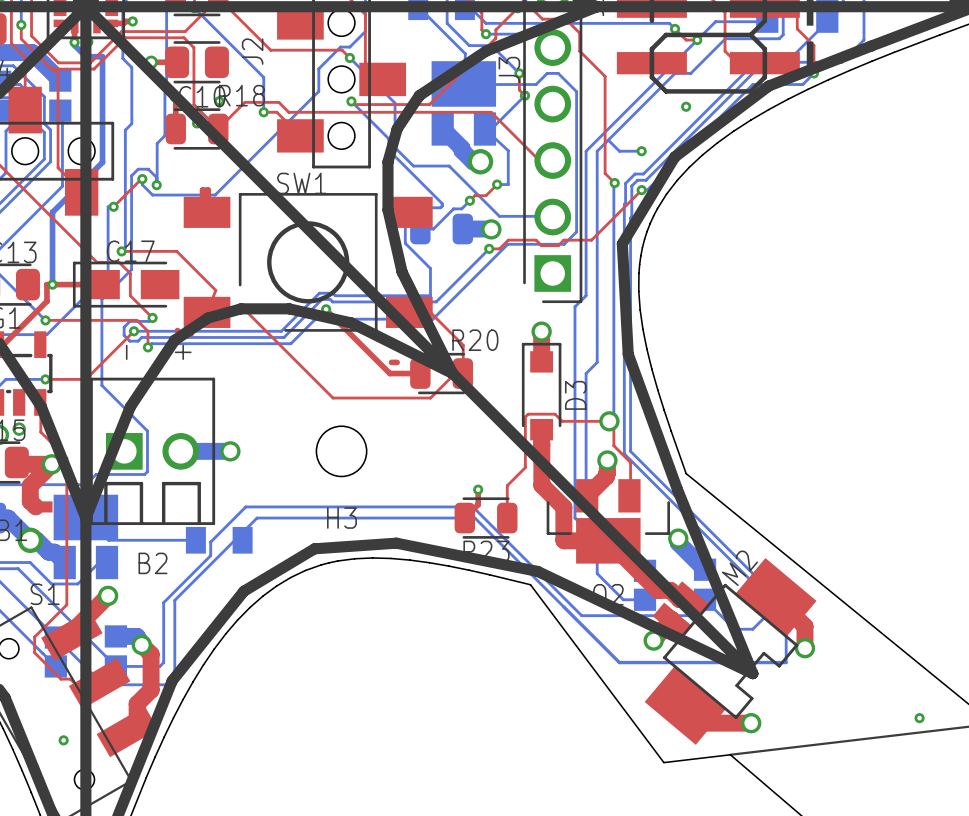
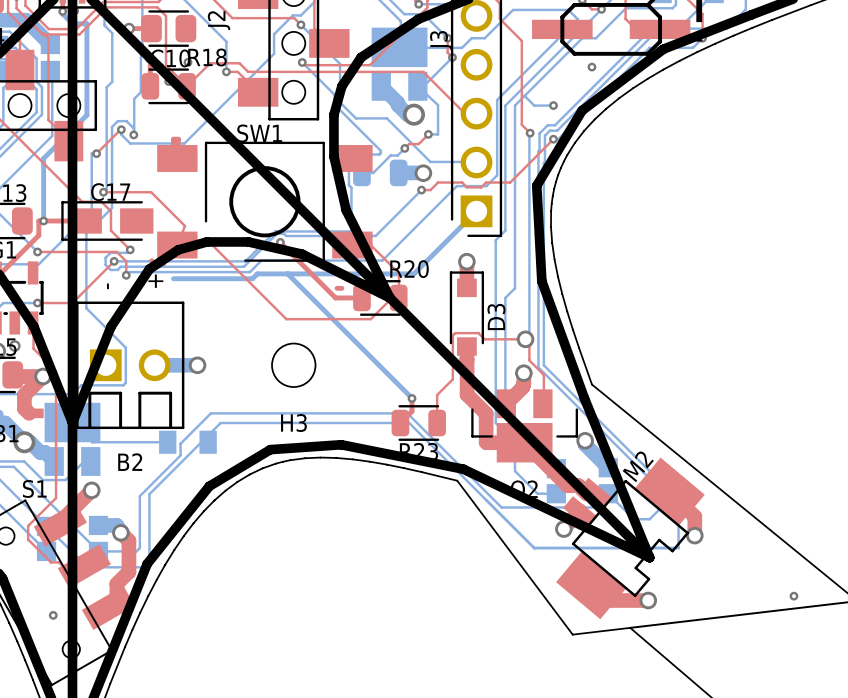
bottom track: (558, 73) (576, 91) (576, 144) -> (481, 38) (484, 38) (513, 9) (568, 9) (577, 19) (497, 100)
bottom track: (530, 244) (507, 244) (432, 319) (315, 319) (304, 330) -> (456, 186) (382, 260) (261, 260)
bottom track: (408, 246) (430, 268) (430, 295) (335, 295) (332, 293) (319, 293) (281, 331) -> (351, 187) (350, 231) (275, 231) (245, 261) (241, 261)
bottom track: none -> (476, 211) (413, 273) (257, 273) (252, 278) (173, 278)
bottom track: none -> (287, 273) (412, 398)

